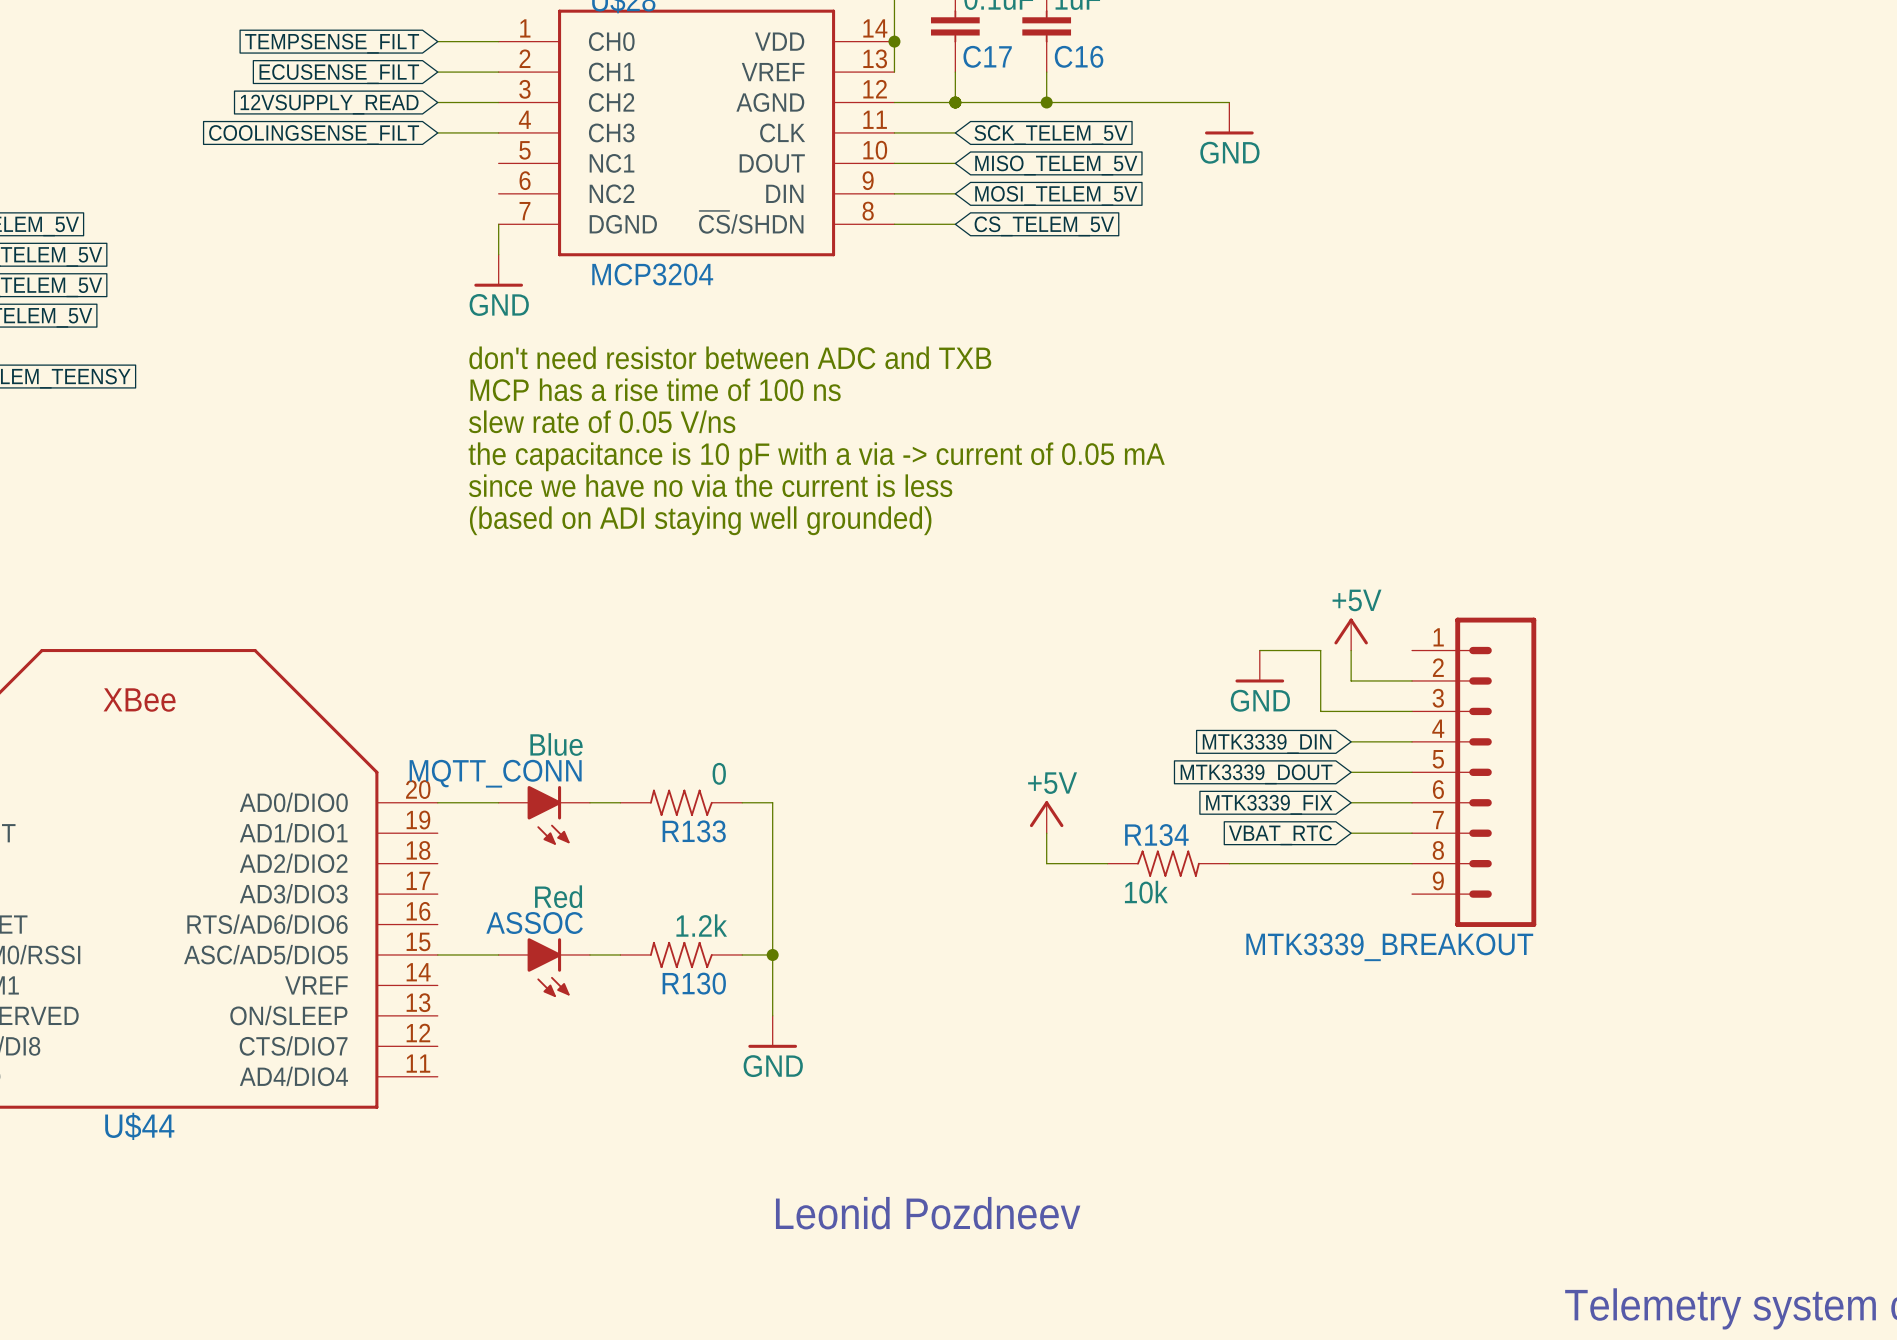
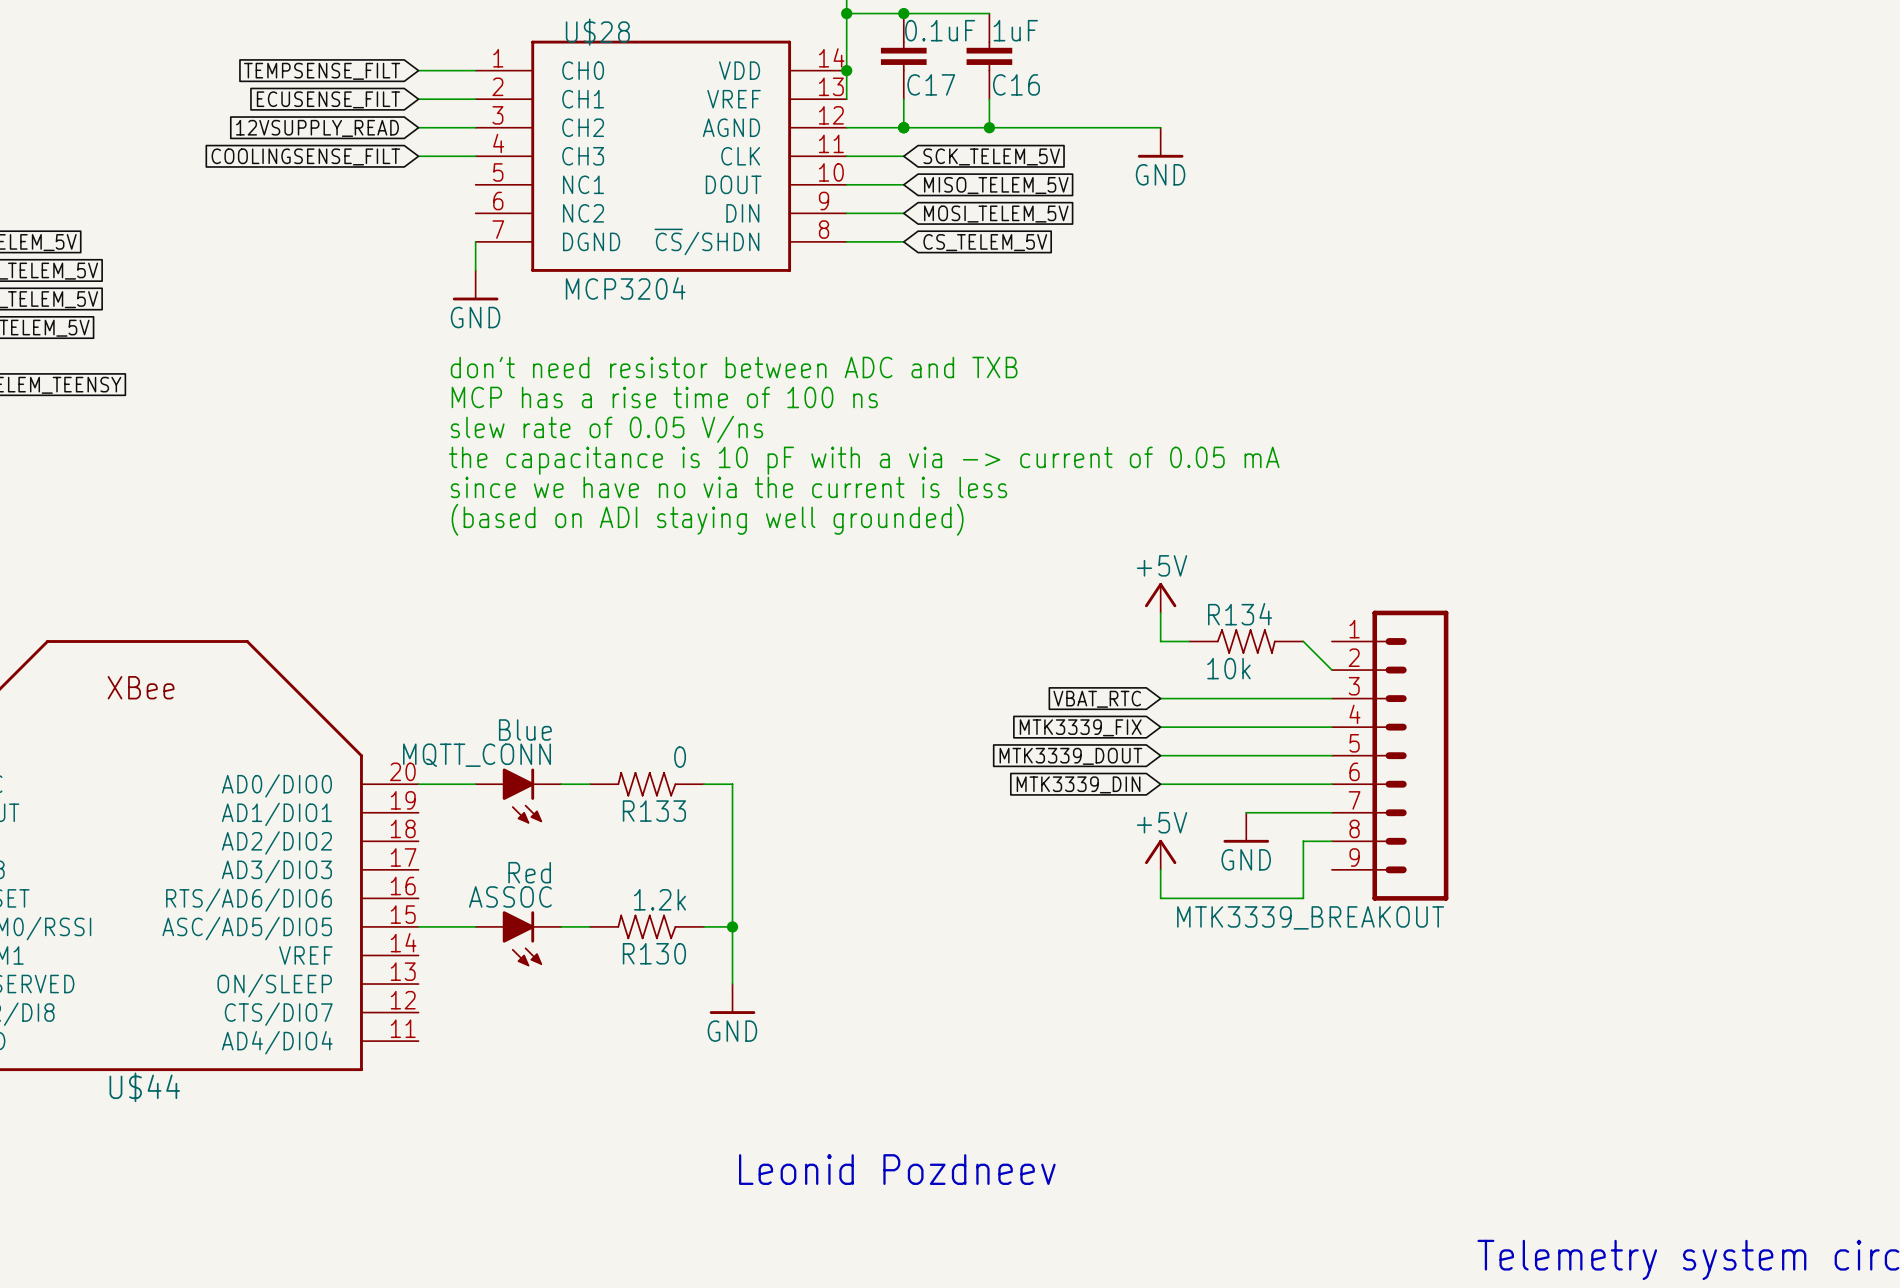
wire: none -> (1160, 612) (1160, 641) (1189, 641)
power symbol position: +5V (1351, 634) -> +5V (1160, 597)
wire: (1259, 650) (1320, 650) (1320, 711) -> (1160, 698) (1246, 698)
wire: (1351, 650) (1351, 680) (1412, 680) -> (1303, 641) (1331, 670)
power symbol position: GND (1259, 666) -> GND (1246, 827)
wire: none -> (1160, 727) (1274, 727)
global label position: MTK3339_DIN (1267, 743) -> MTK3339_DIN (1078, 784)
wire: none -> (1160, 755) (1274, 755)
global label position: MTK3339_DOUT (1256, 774) -> MTK3339_DOUT (1070, 756)
wire: none -> (1160, 784) (1274, 784)
global label position: MTK3339_FIX (1269, 804) -> MTK3339_FIX (1080, 727)
power symbol: +5V (1046, 817) -> none
wire: (1046, 833) (1046, 863) (1107, 863) -> none
wire: none -> (1246, 812) (1274, 812)
global label position: VBAT_RTC (1280, 835) -> VBAT_RTC (1097, 699)
R134 position: (1168, 863) -> (1246, 641)
wire: (1229, 863) (1381, 863) -> (1160, 869) (1160, 898) (1303, 898) (1303, 841)
power symbol: none -> +5V (1160, 854)

